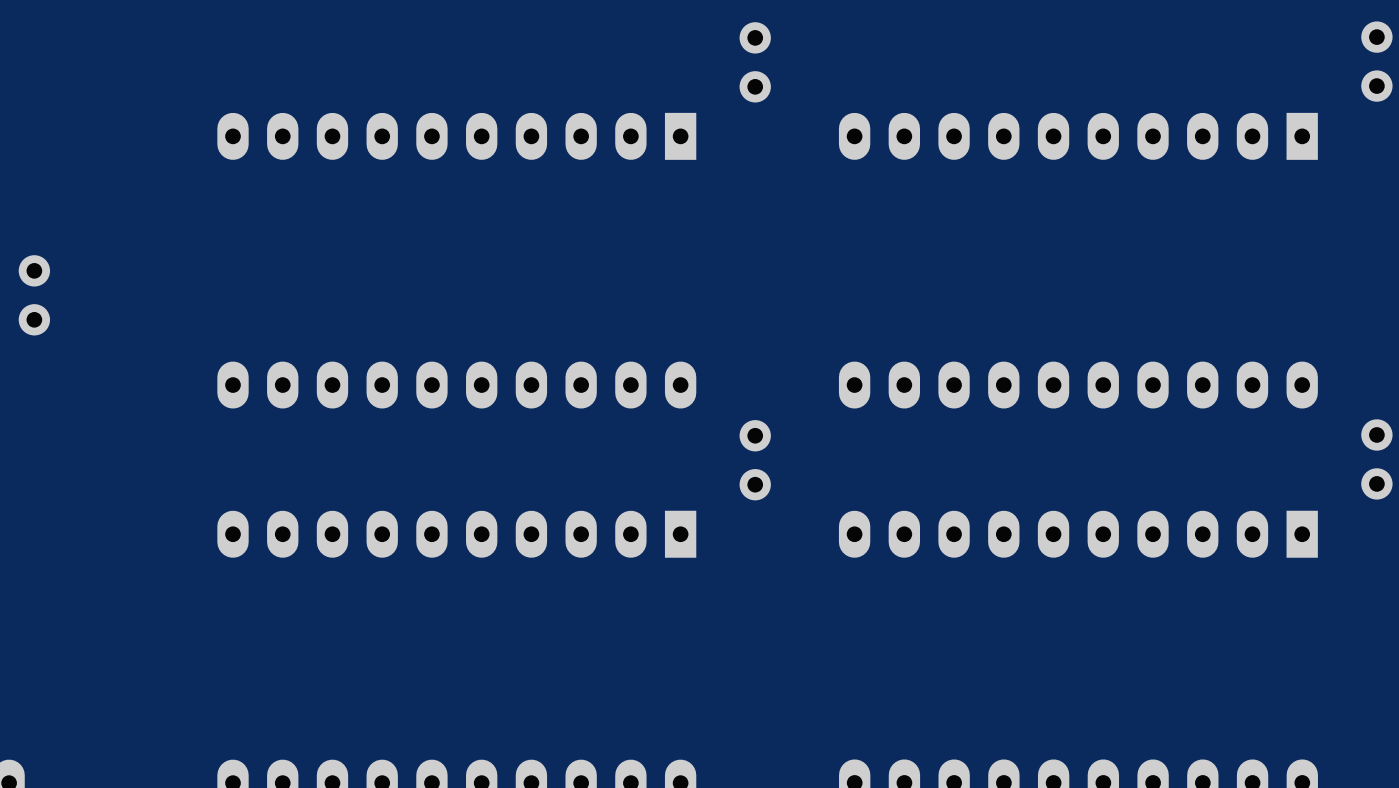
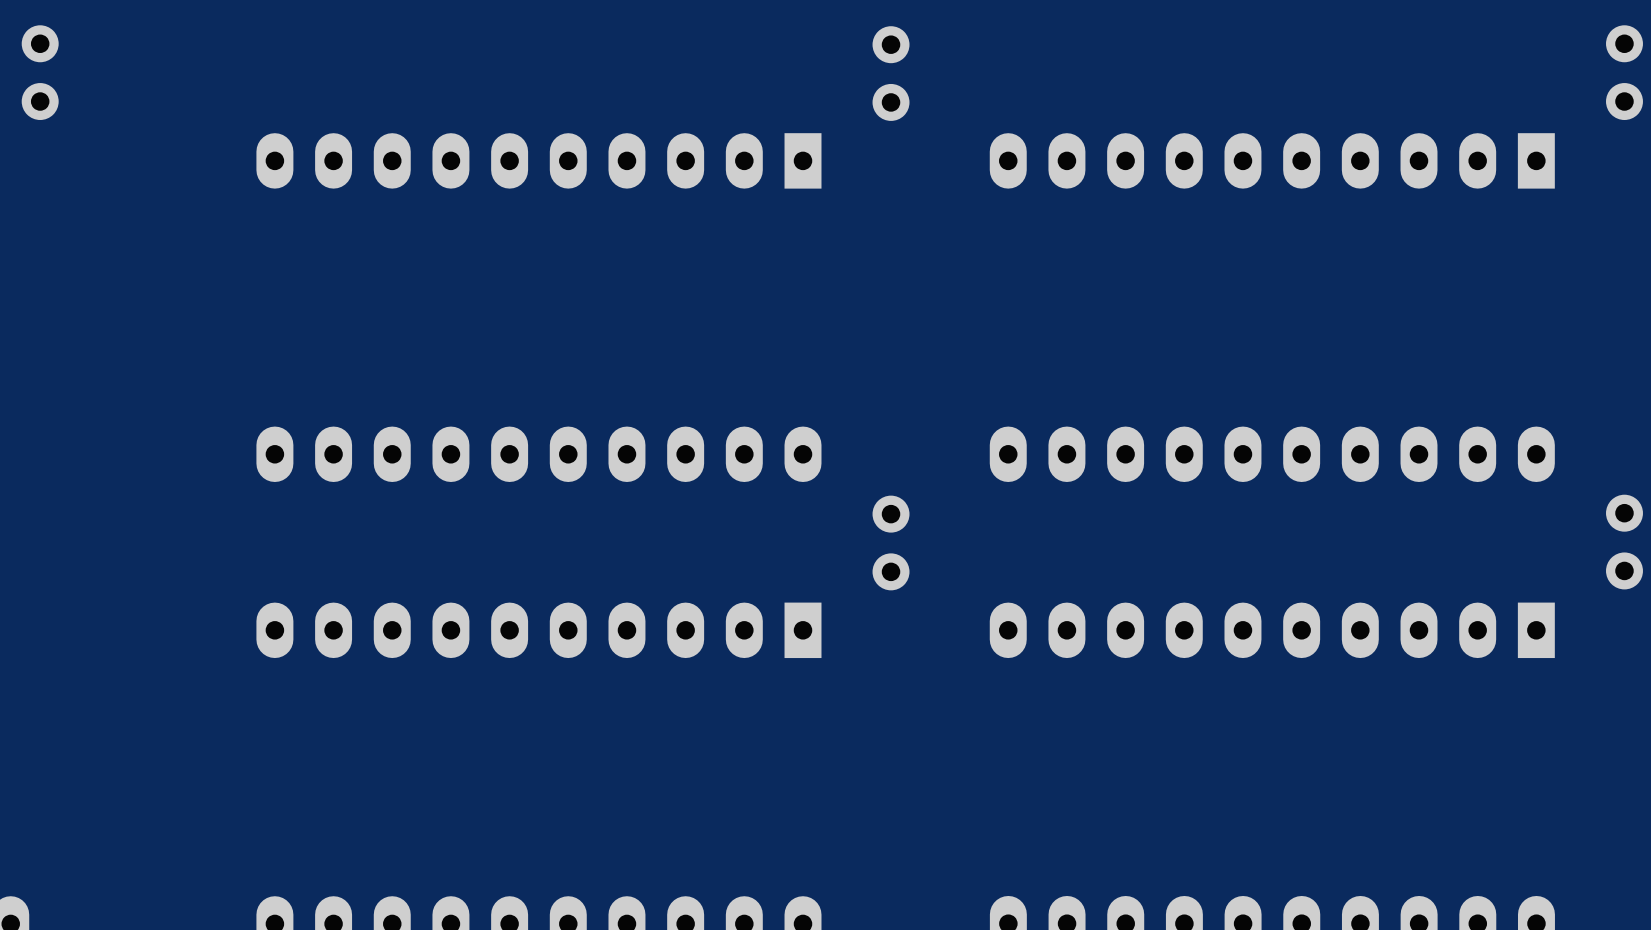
part position: (34, 295) -> (40, 72)

